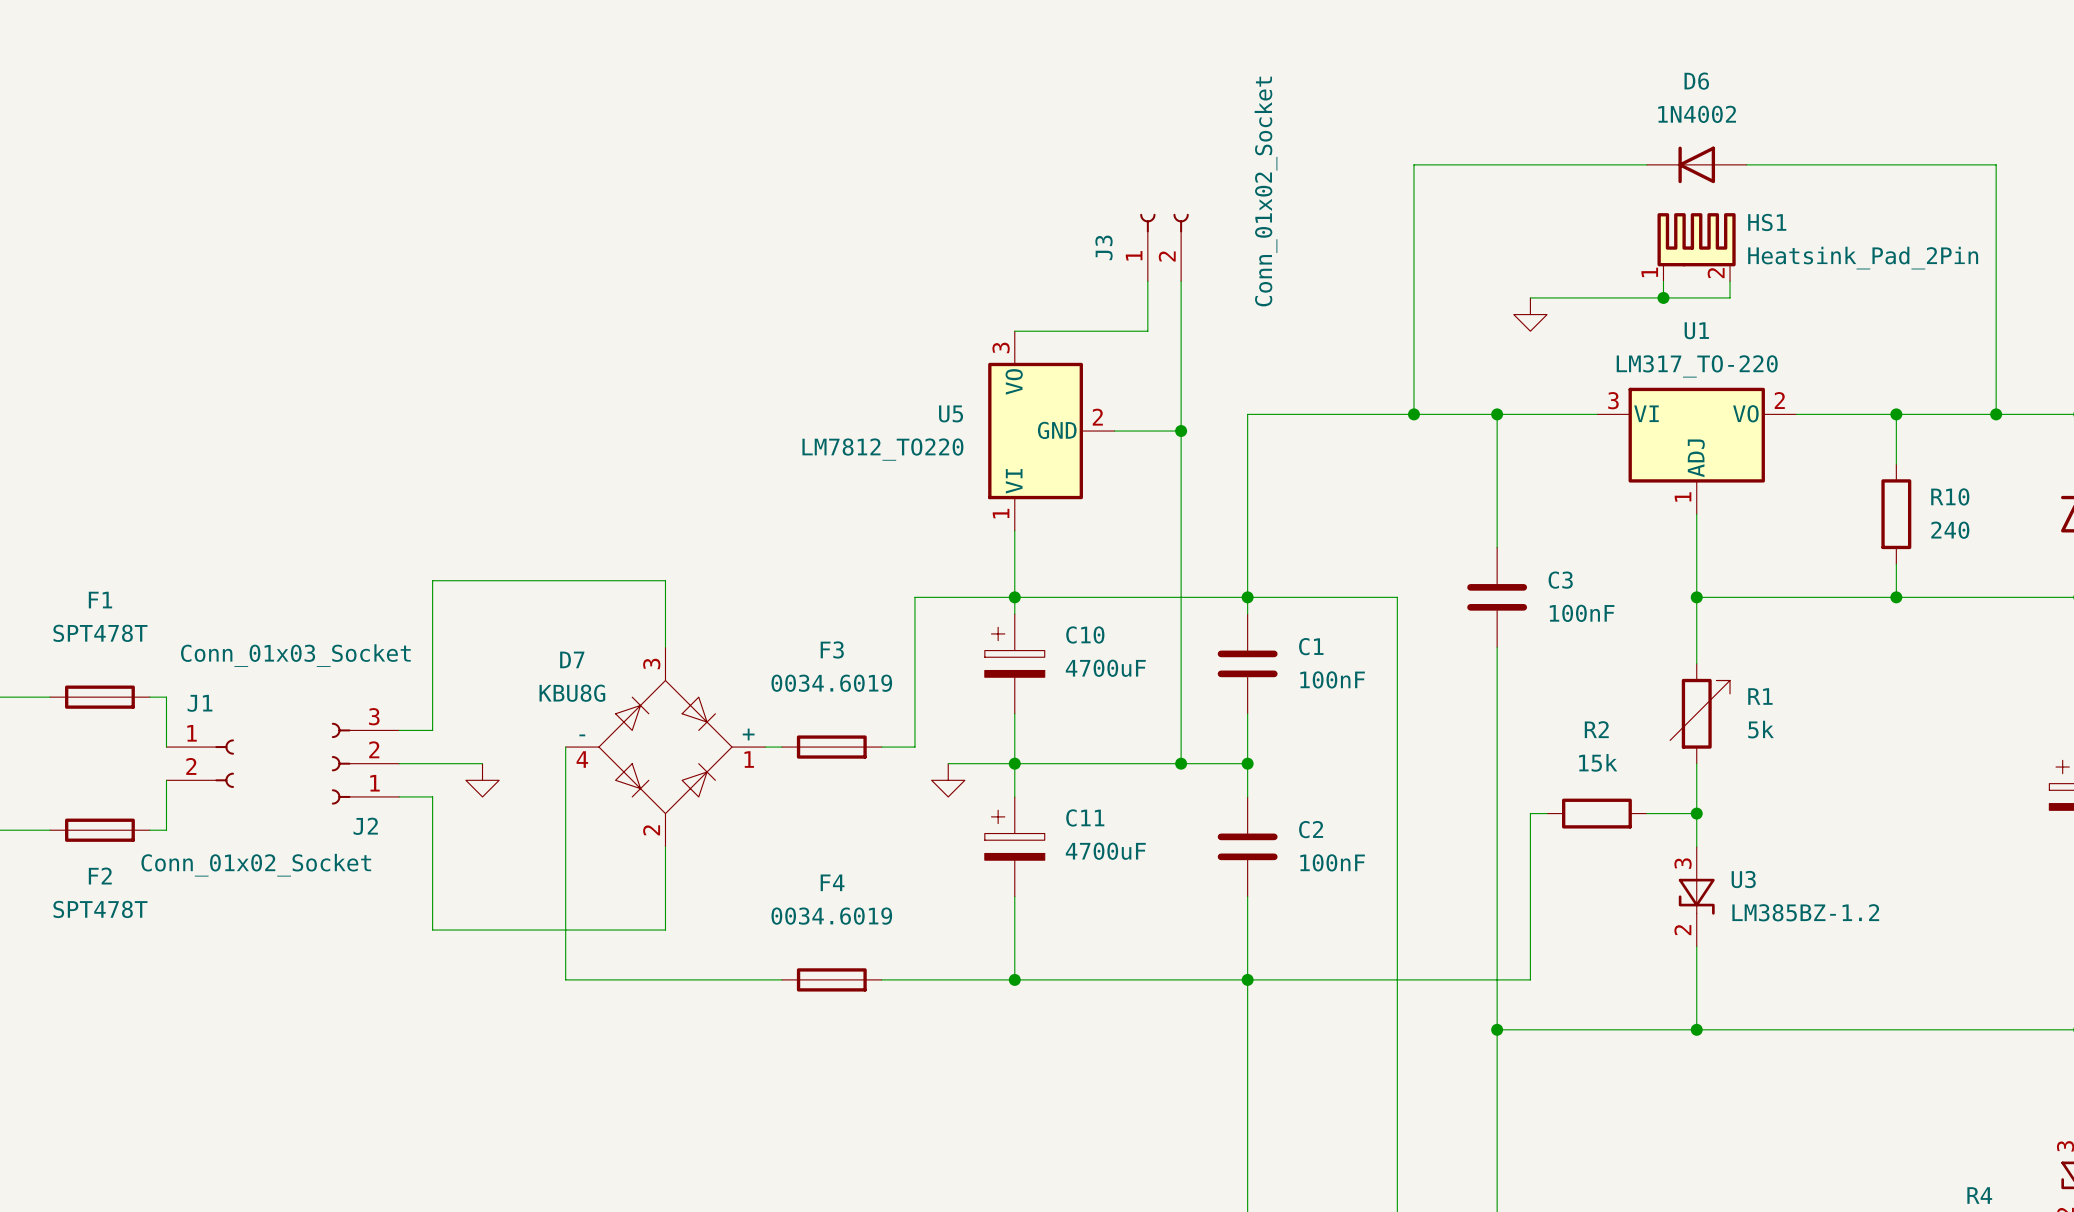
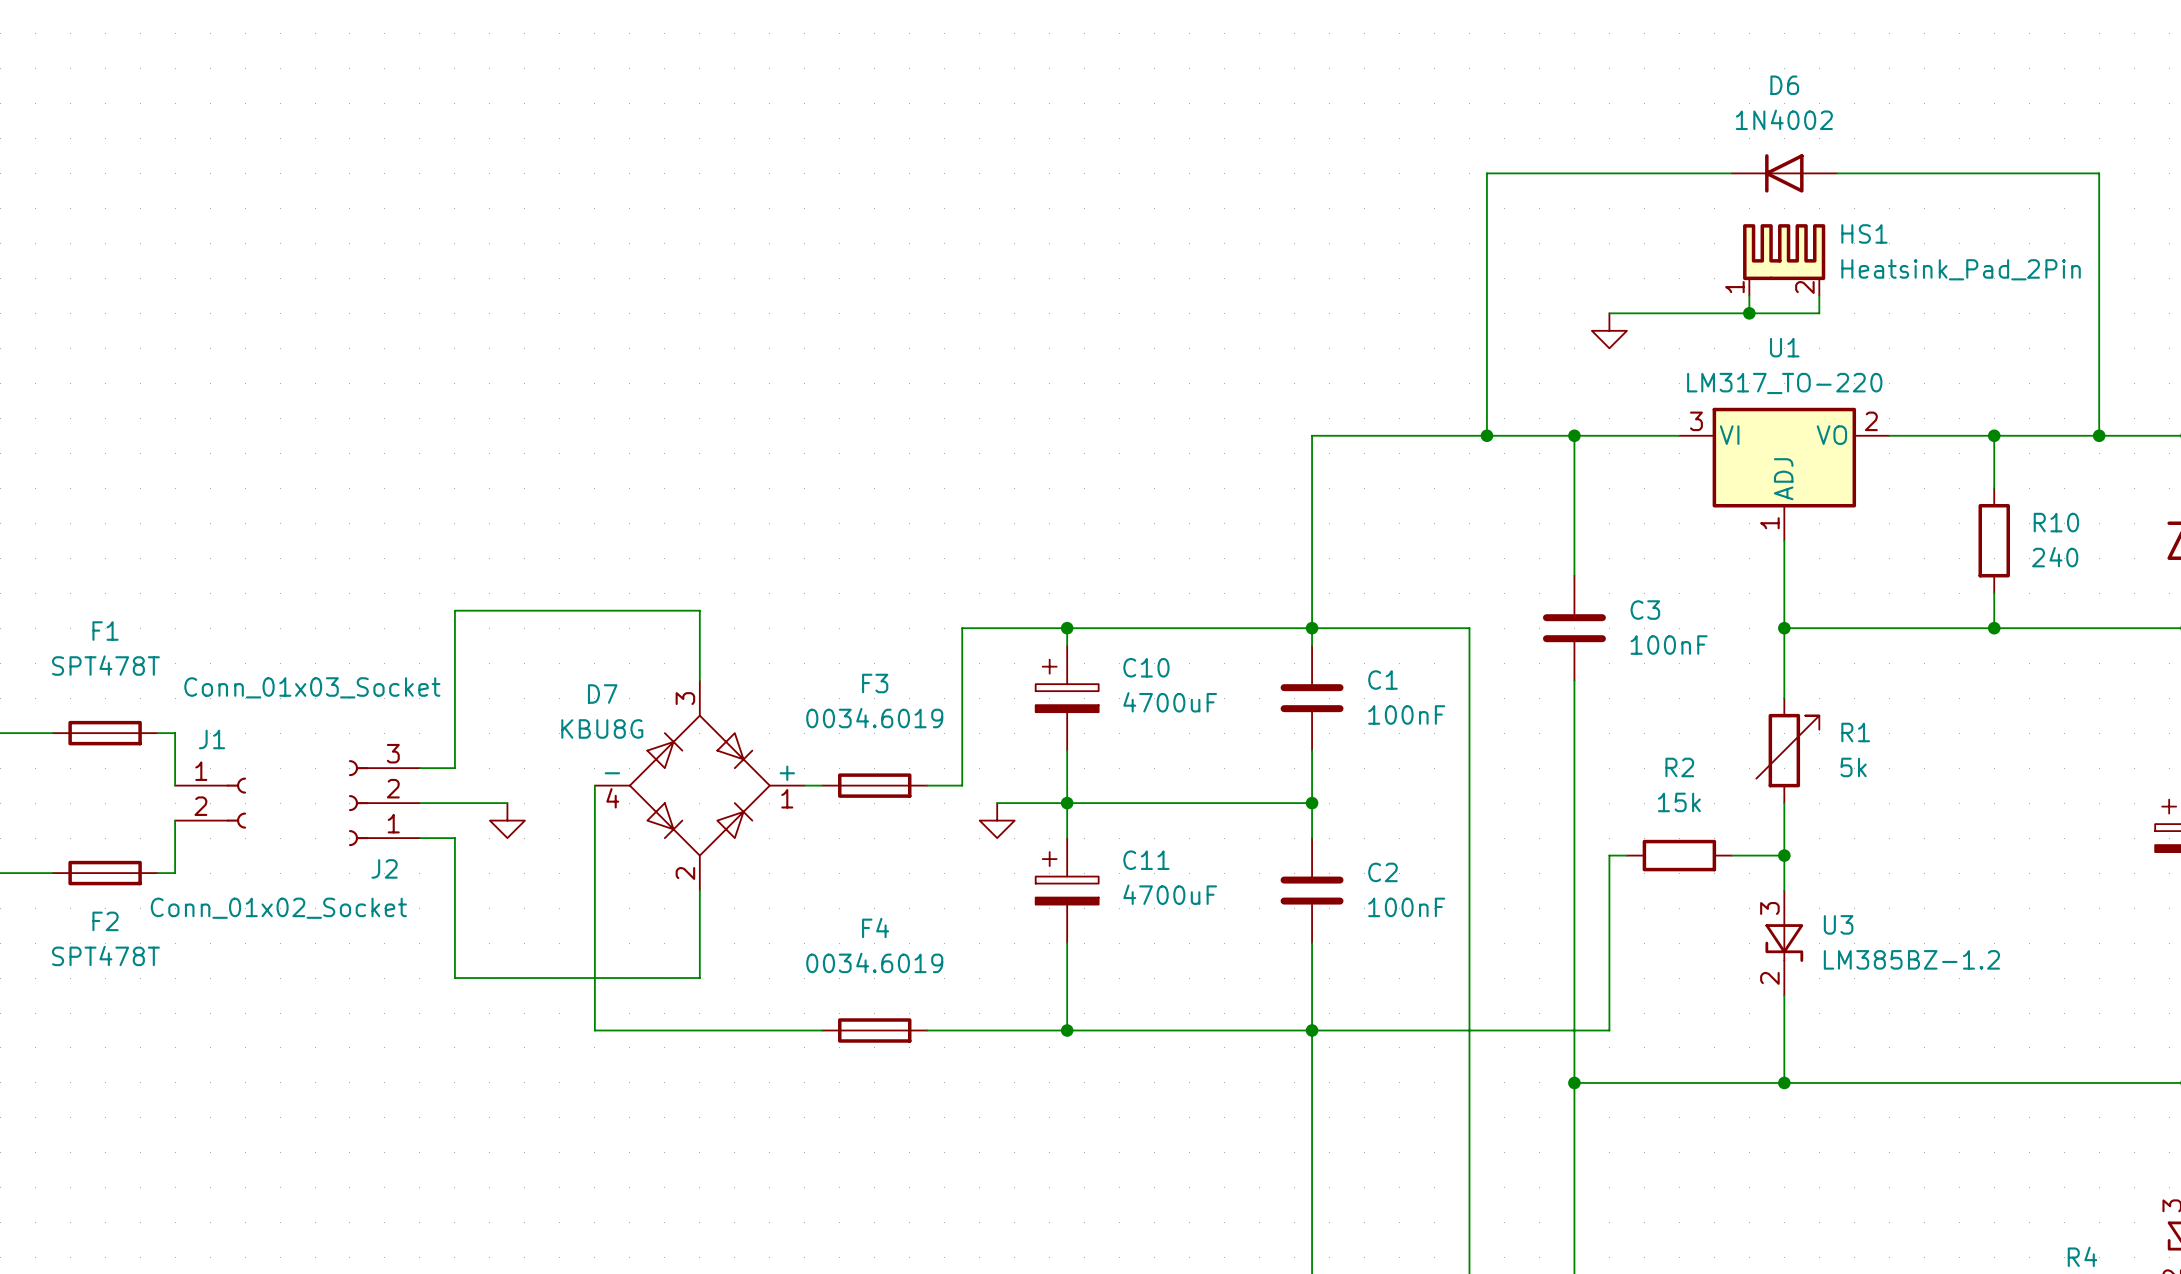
J3: Conn_01x02_Socket (1164, 247) -> none
wire: (1147, 281) (1147, 331) (1014, 331) -> none
wire: (1181, 281) (1181, 763) -> none
U5: LM7812_TO220 (1051, 431) -> none
wire: (1114, 431) (1181, 431) -> none
junction: (1181, 431) -> none
wire: (1014, 530) (1014, 597) -> none
junction: (1181, 763) -> none

